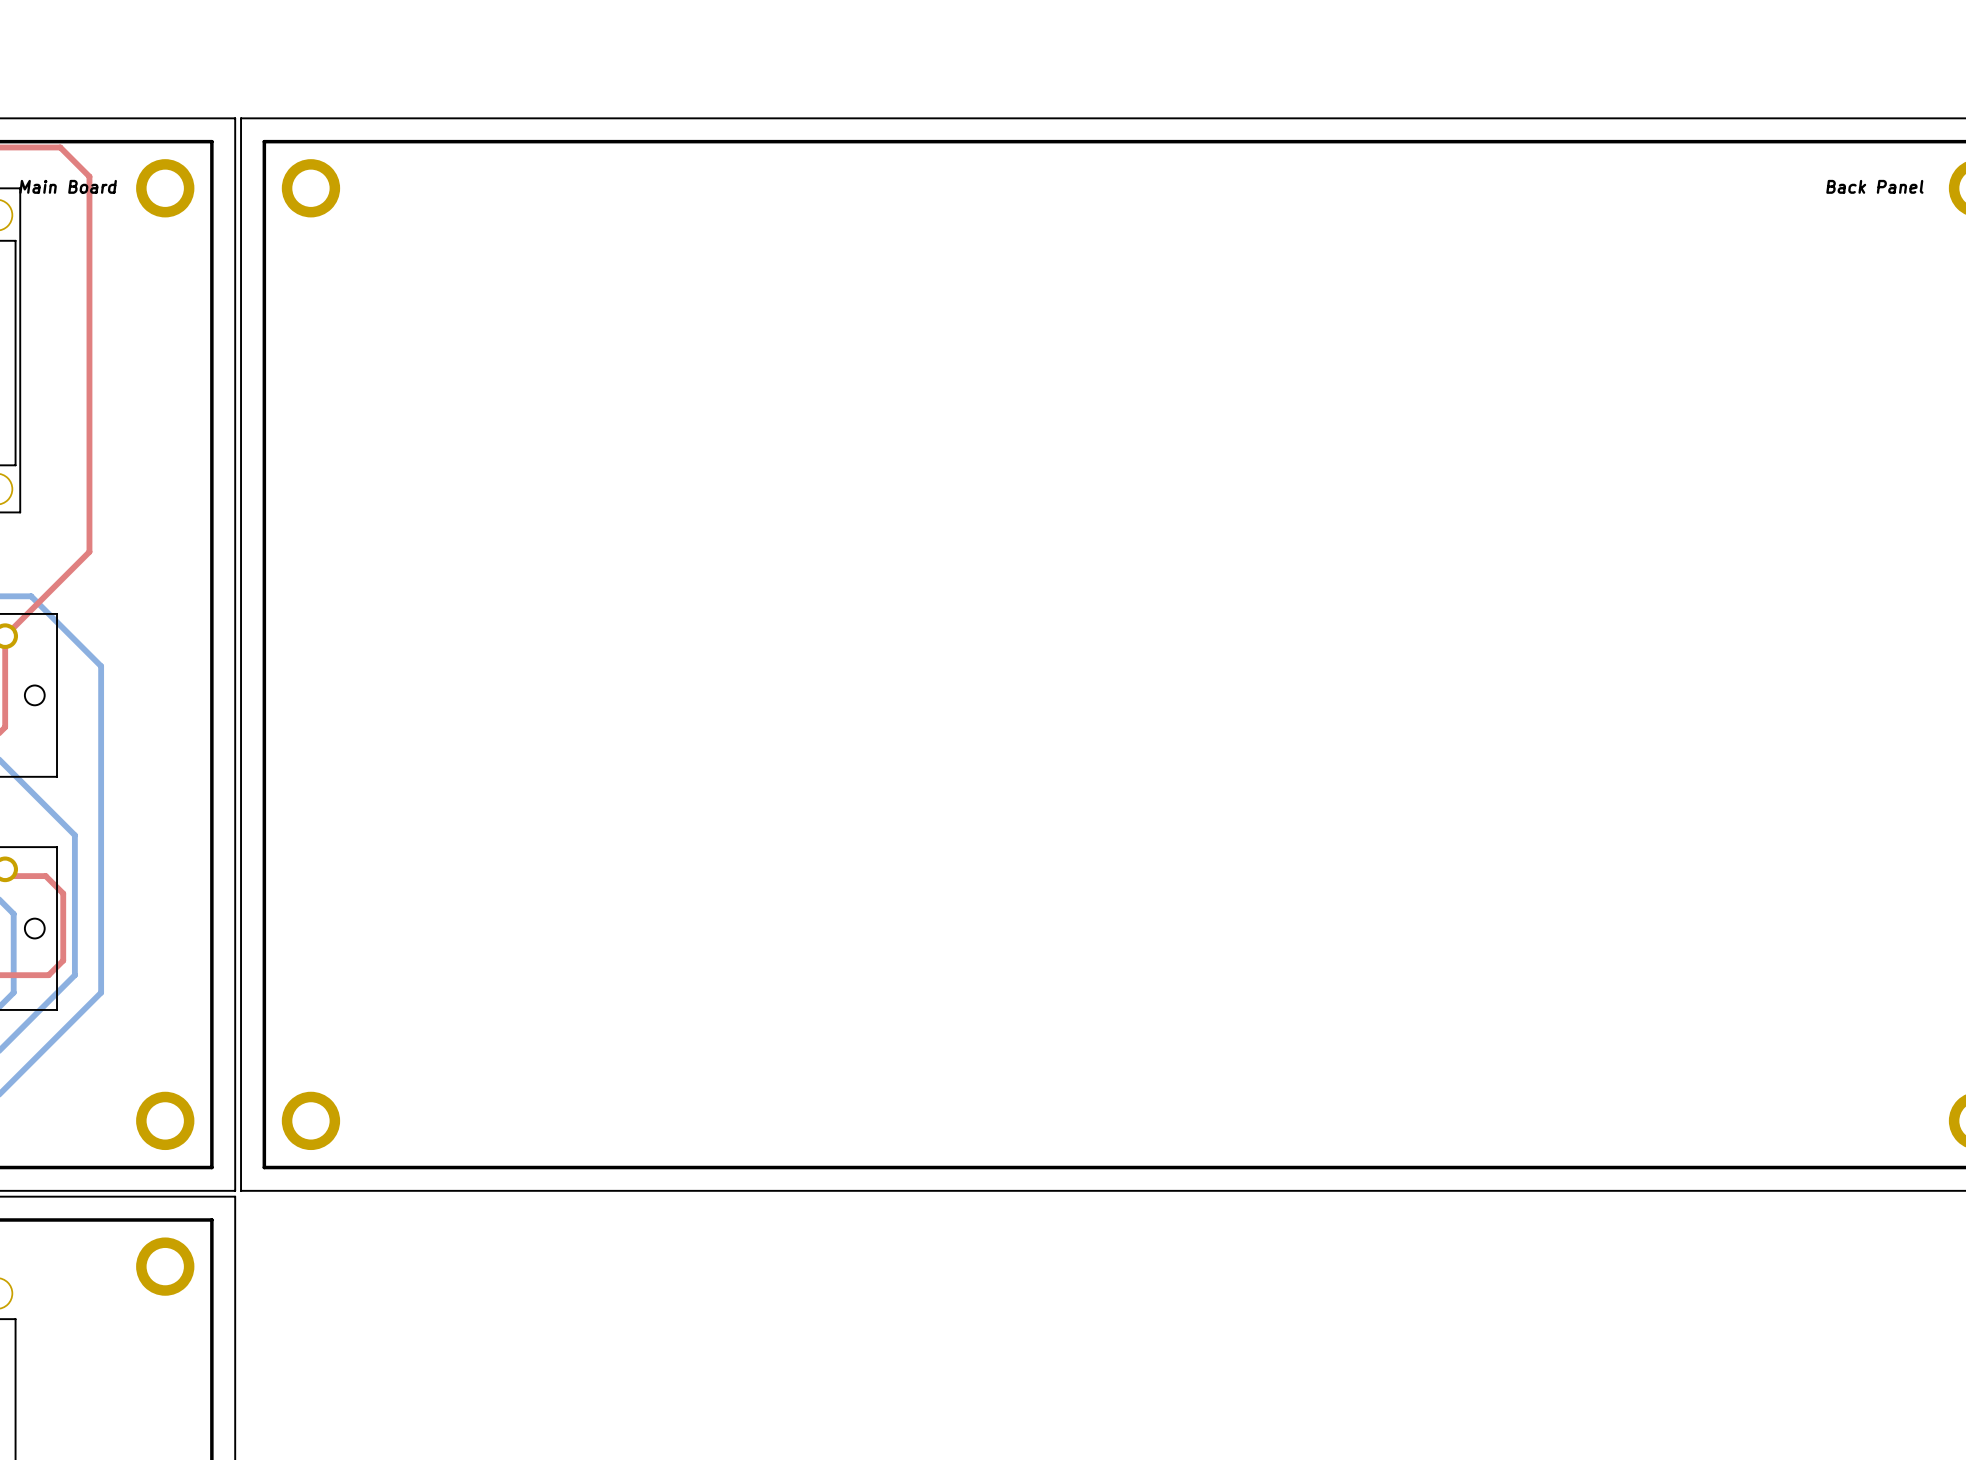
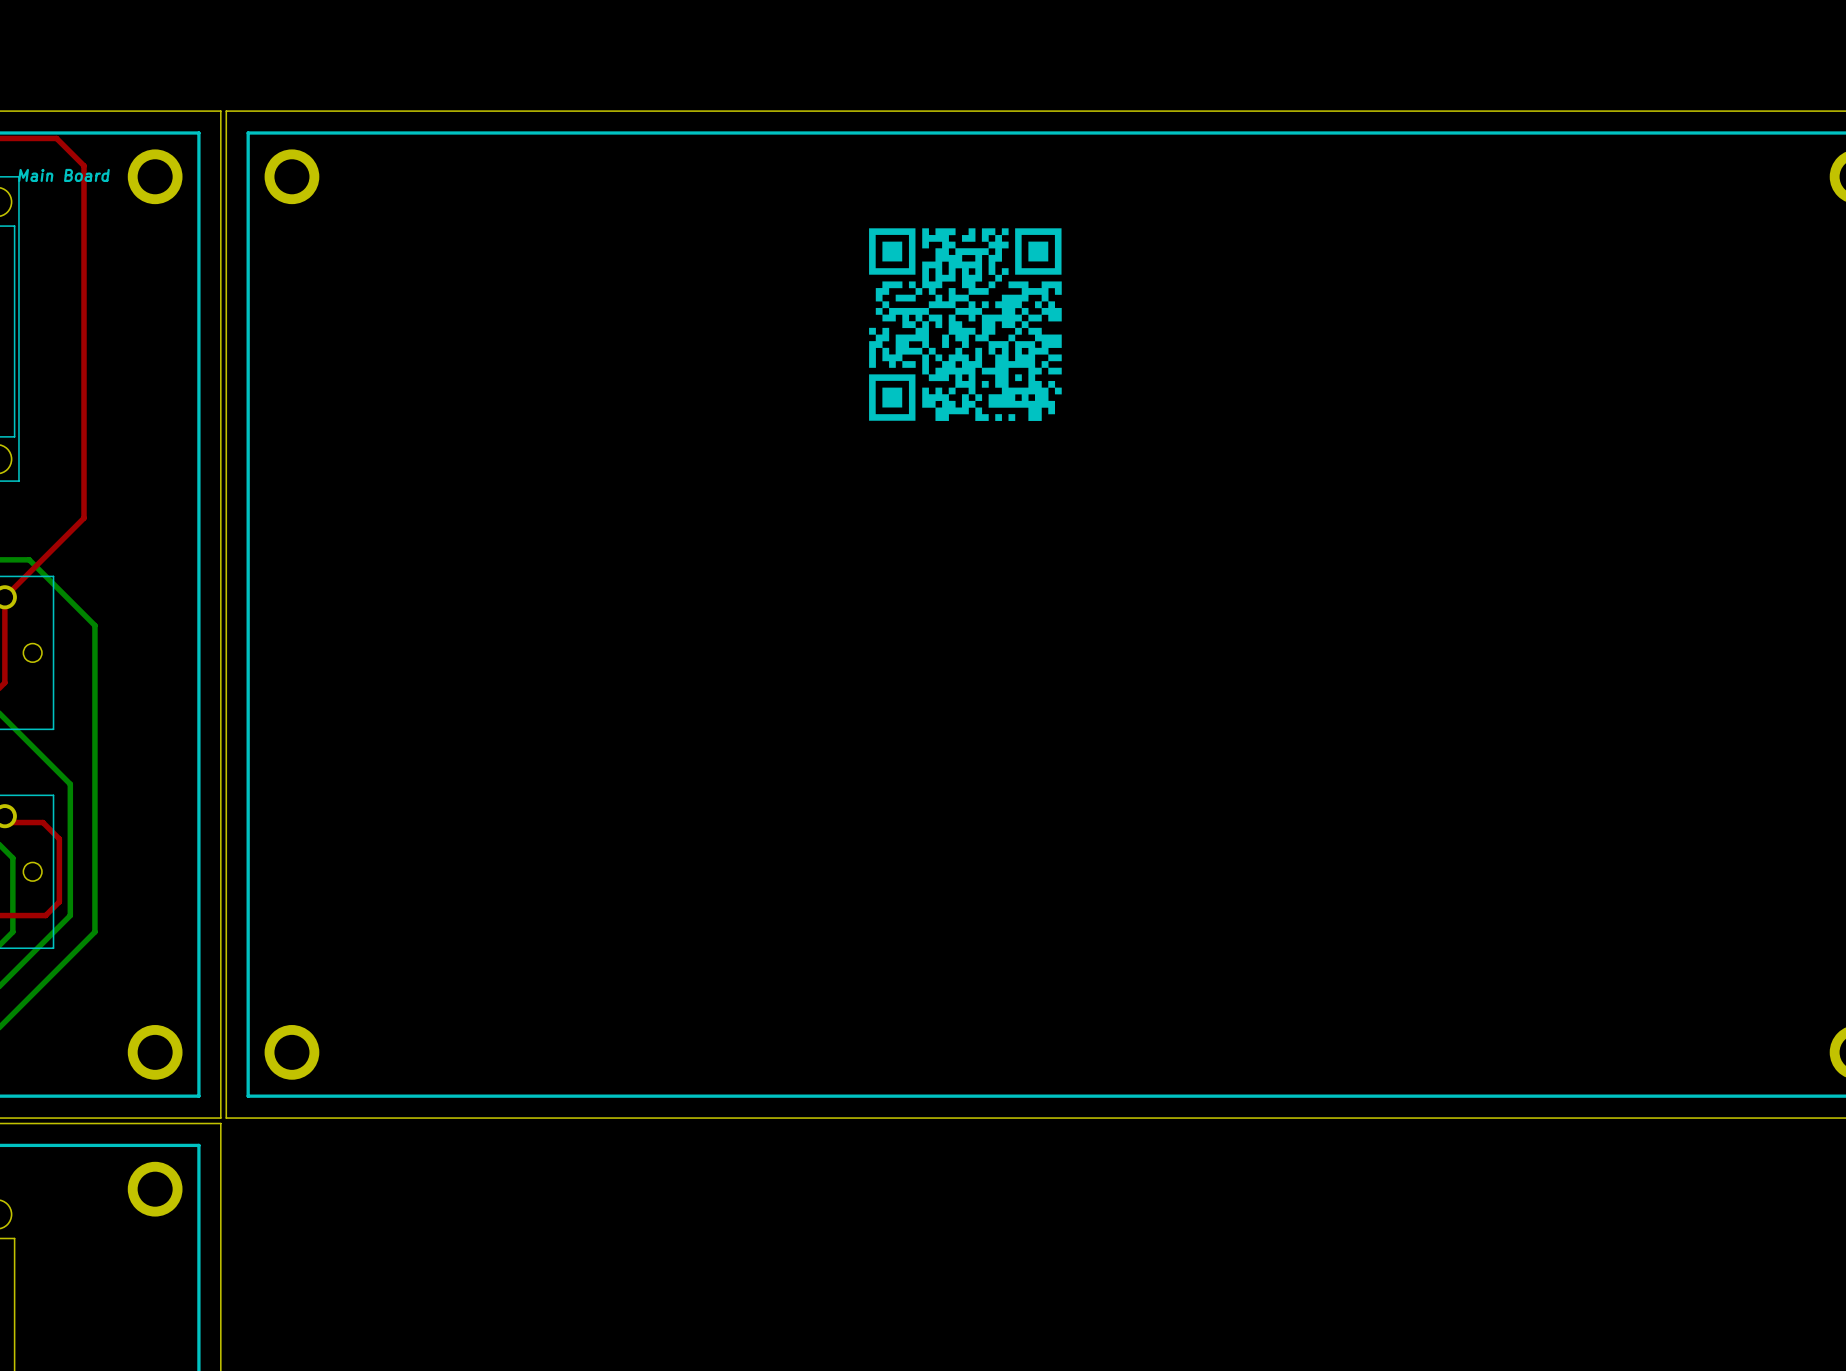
text: Back Panel (1874, 186) -> none
drawing: none -> [869, 228, 1062, 421]

